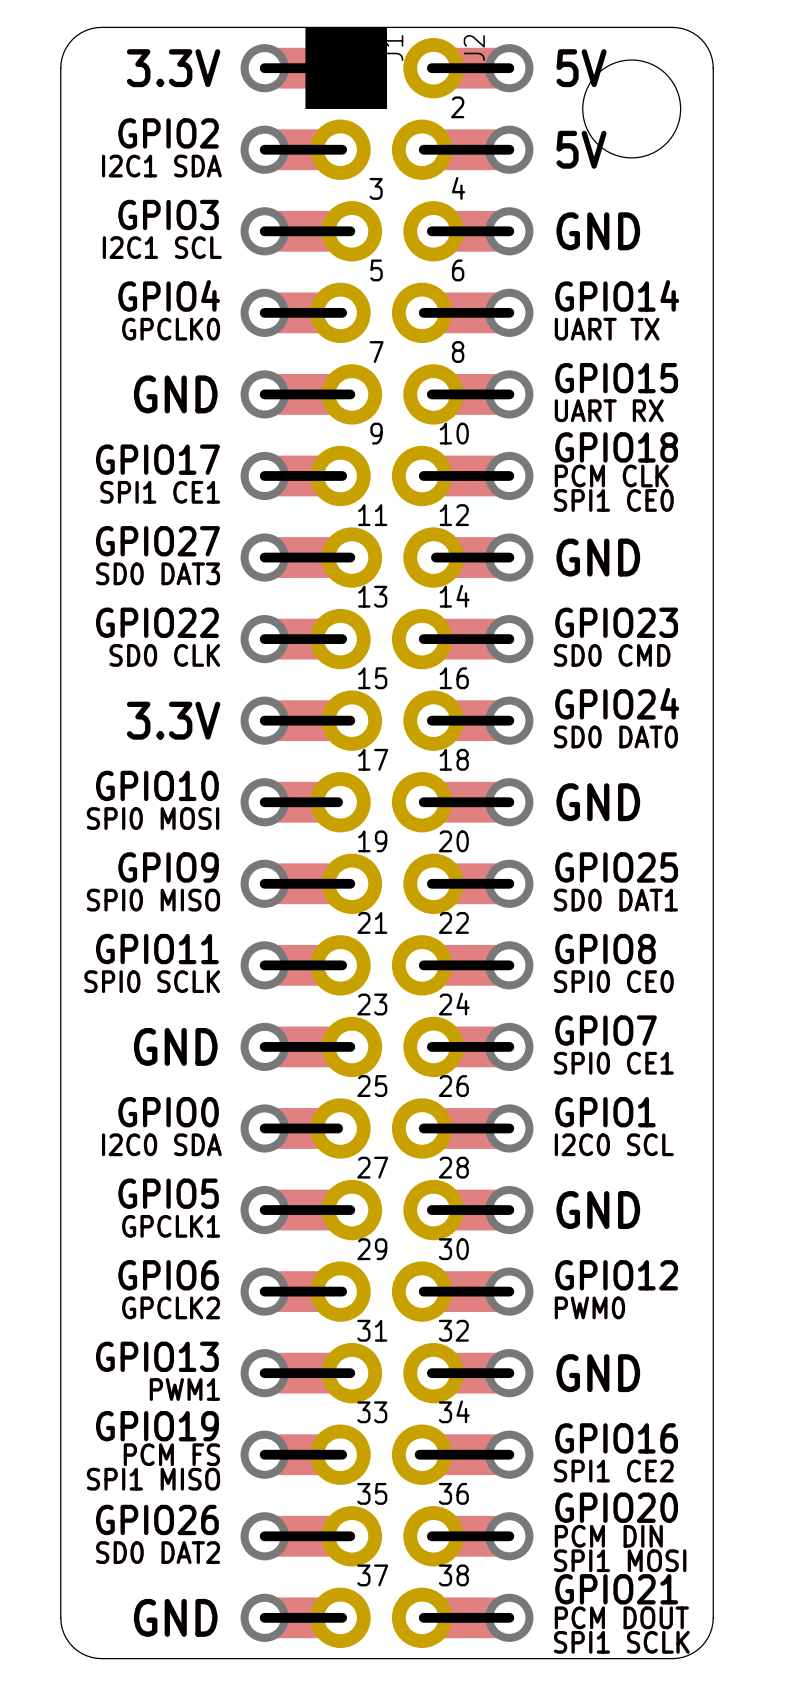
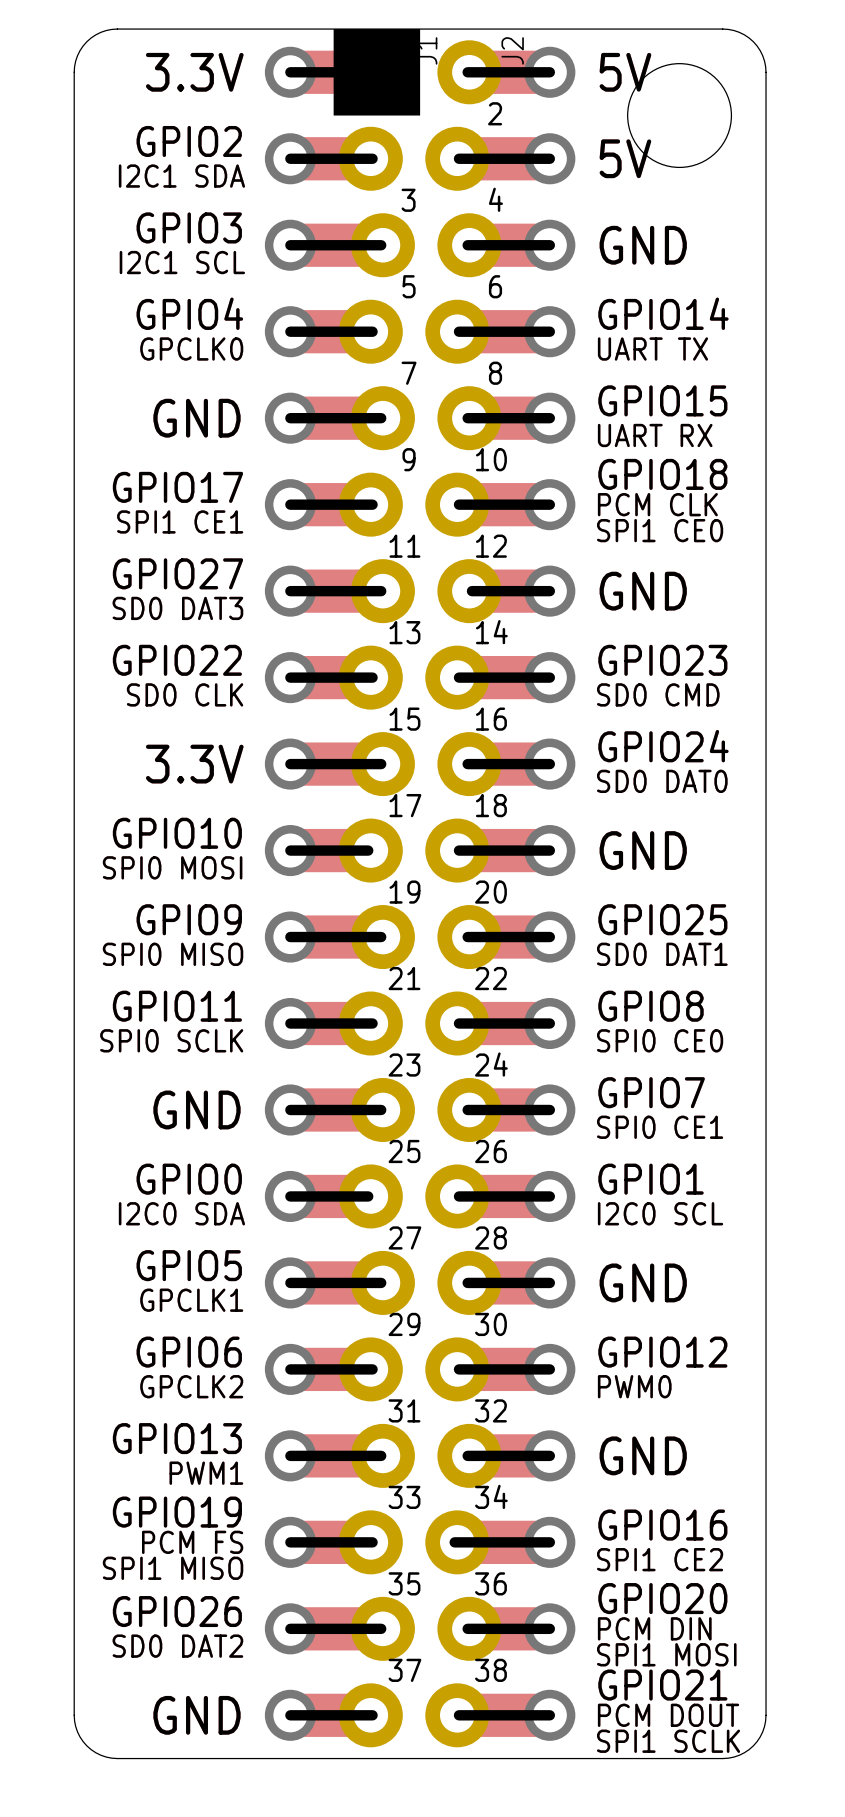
text: 3.3V (173, 68) -> none
text: none -> 3.3V (194, 72)
text: none -> 5V (625, 72)
text: 5V (581, 68) -> none
text: GPIO2 (168, 133) -> none
text: none -> GPIO2 (189, 141)
text: none -> 5V (625, 158)
text: 5V (581, 149) -> none
text: I2C1 SDA (161, 166) -> none
text: none -> I2C1 SDA (181, 176)
text: GPIO3 (168, 214) -> none
text: none -> GPIO3 (189, 227)
text: none -> GND (643, 245)
text: GND (598, 231) -> none
text: I2C1 SCL (162, 247) -> none
text: none -> I2C1 SCL (182, 262)
text: GPIO4 (169, 295) -> none
text: none -> GPIO4 (189, 313)
text: none -> GPIO14 (663, 313)
text: GPIO14 (617, 295) -> none
text: GPCLK0 (171, 329) -> none
text: none -> GPCLK0 (191, 349)
text: none -> UART TX (652, 349)
text: UART TX (607, 329) -> none
text: none -> GPIO15 (662, 400)
text: GPIO15 (616, 378) -> none
text: GND (175, 394) -> none
text: none -> GND (196, 418)
text: none -> UART RX (655, 435)
text: UART RX (609, 410) -> none
text: none -> GPIO18 (662, 474)
text: GPIO18 (616, 447) -> none
text: GPIO17 (157, 459) -> none
text: none -> GPIO17 (177, 487)
text: PCM CLK (611, 475) -> none
text: none -> PCM CLK (657, 504)
text: SPI1 CE1 (160, 492) -> none
text: none -> SPI1 CE1 (180, 521)
text: SPI1 CE0 (613, 500) -> none
text: none -> SPI1 CE0 (660, 530)
text: GPIO27 (157, 541) -> none
text: none -> GPIO27 (177, 573)
text: none -> GND (643, 591)
text: GND (598, 557) -> none
text: SD0 DAT3 (158, 573) -> none
text: none -> SD0 DAT3 (177, 608)
text: GPIO22 (157, 622) -> none
text: none -> GPIO22 (177, 660)
text: none -> GPIO23 (662, 660)
text: GPIO23 (616, 622) -> none
text: SD0 CLK (164, 655) -> none
text: none -> SD0 CLK (185, 694)
text: none -> SD0 CMD (658, 694)
text: SD0 CMD (612, 655) -> none
text: none -> GPIO24 (663, 746)
text: GPIO24 (617, 703) -> none
text: 3.3V (173, 720) -> none
text: none -> 3.3V (194, 764)
text: SD0 DAT0 (615, 736) -> none
text: none -> SD0 DAT0 (662, 781)
text: GPIO10 (157, 785) -> none
text: none -> GPIO10 (177, 833)
text: none -> GND (643, 850)
text: GND (598, 802) -> none
text: SPI0 MOSI (153, 818) -> none
text: none -> SPI0 MOSI (172, 867)
text: GPIO9 (168, 867) -> none
text: none -> GPIO9 (189, 919)
text: none -> GPIO25 (662, 919)
text: GPIO25 (616, 867) -> none
text: SPI0 MISO (153, 900) -> none
text: none -> SPI0 MISO (173, 954)
text: SD0 DAT1 (615, 900) -> none
text: none -> SD0 DAT1 (662, 954)
text: GPIO11 (157, 949) -> none
text: none -> GPIO11 (177, 1006)
text: none -> GPIO8 (650, 1006)
text: GPIO8 (605, 949) -> none
text: SPI0 SCLK (152, 981) -> none
text: none -> SPI0 SCLK (171, 1040)
text: SPI0 CE0 (613, 981) -> none
text: none -> SPI0 CE0 (660, 1040)
text: none -> GPIO7 (651, 1092)
text: GPIO7 (606, 1030) -> none
text: GND (175, 1046) -> none
text: none -> GND (196, 1109)
text: SPI0 CE1 (613, 1063) -> none
text: none -> SPI0 CE1 (660, 1127)
text: GPIO0 (168, 1112) -> none
text: none -> GPIO0 (189, 1179)
text: none -> GPIO1 (650, 1179)
text: GPIO1 (605, 1112) -> none
text: I2C0 SDA (161, 1144) -> none
text: none -> I2C0 SDA (181, 1213)
text: none -> I2C0 SCL (660, 1213)
text: I2C0 SCL (614, 1144) -> none
text: GPIO5 (168, 1193) -> none
text: none -> GPIO5 (189, 1265)
text: none -> GND (643, 1282)
text: GND (598, 1210) -> none
text: GPCLK1 (171, 1226) -> none
text: none -> GPCLK1 (191, 1300)
text: GPIO6 (168, 1275) -> none
text: none -> GPIO6 (189, 1352)
text: none -> GPIO12 (662, 1352)
text: GPIO12 (616, 1275) -> none
text: GPCLK2 (171, 1307) -> none
text: none -> GPCLK2 (191, 1386)
text: PWM0 (589, 1307) -> none
text: none -> PWM0 (634, 1386)
text: GPIO13 (157, 1356) -> none
text: none -> GPIO13 (177, 1438)
text: none -> GND (643, 1455)
text: GND (598, 1373) -> none
text: PWM1 (184, 1389) -> none
text: none -> PWM1 (206, 1473)
text: GPIO19 (157, 1426) -> none
text: none -> GPIO19 (177, 1512)
text: none -> GPIO16 (662, 1525)
text: GPIO16 (616, 1438) -> none
text: PCM FS (171, 1454) -> none
text: none -> PCM FS (192, 1542)
text: SPI1 CE2 (613, 1471) -> none
text: none -> SPI1 CE2 (660, 1559)
text: SPI1 MISO (153, 1479) -> none
text: none -> SPI1 MISO (173, 1568)
text: none -> GPIO20 (662, 1598)
text: GPIO20 (616, 1507) -> none
text: GPIO26 (157, 1519) -> none
text: none -> GPIO26 (177, 1611)
text: PCM DIN (608, 1536) -> none
text: none -> PCM DIN (654, 1628)
text: SD0 DAT2 (158, 1552) -> none
text: none -> SD0 DAT2 (177, 1646)
text: none -> SPI1 MOSI (666, 1654)
text: SPI1 MOSI (620, 1560) -> none
text: none -> GPIO21 (662, 1685)
text: GPIO21 (616, 1589) -> none
text: GND (175, 1617) -> none
text: none -> GND (196, 1715)
text: PCM DOUT (621, 1617) -> none
text: none -> PCM DOUT (668, 1715)
text: SPI1 SCLK (621, 1642) -> none
text: none -> SPI1 SCLK (668, 1741)

